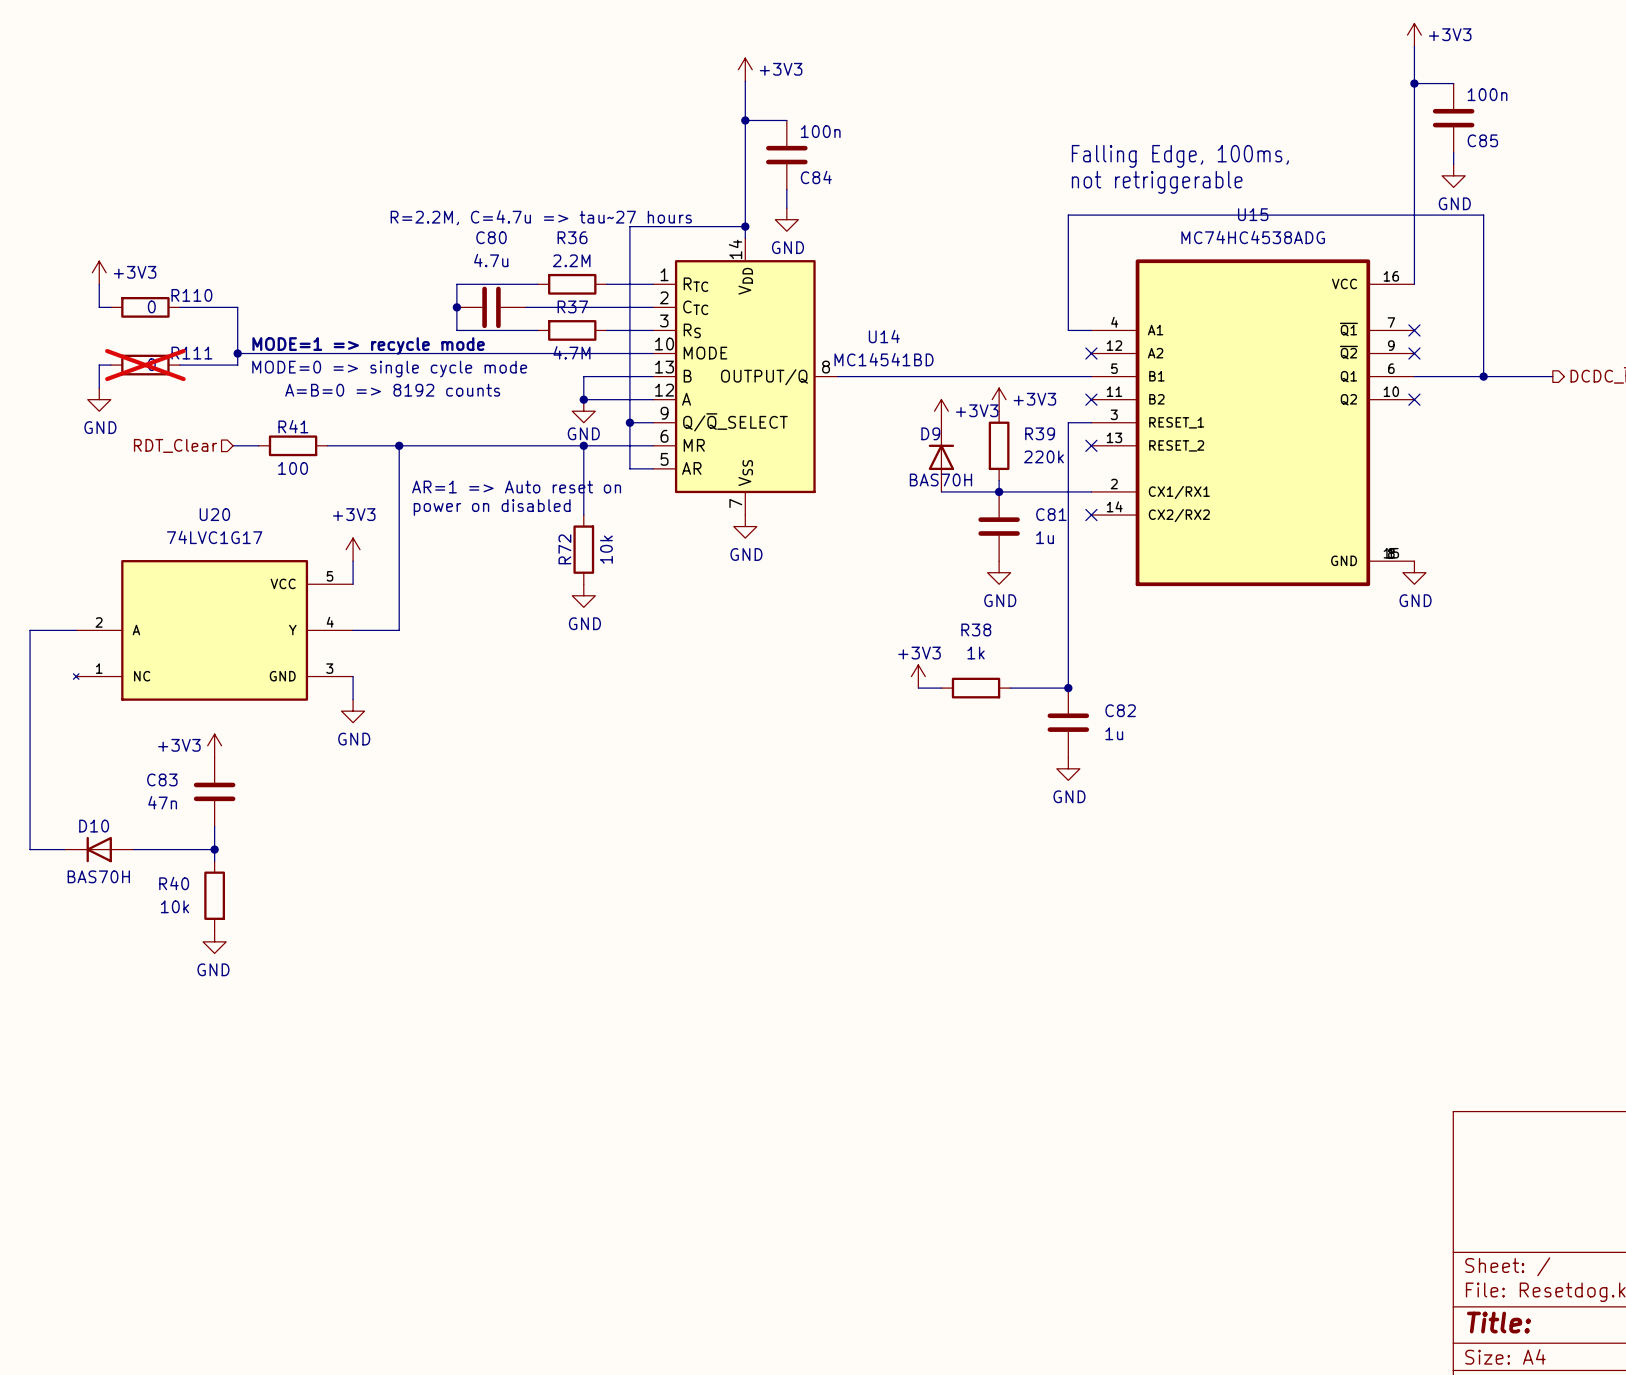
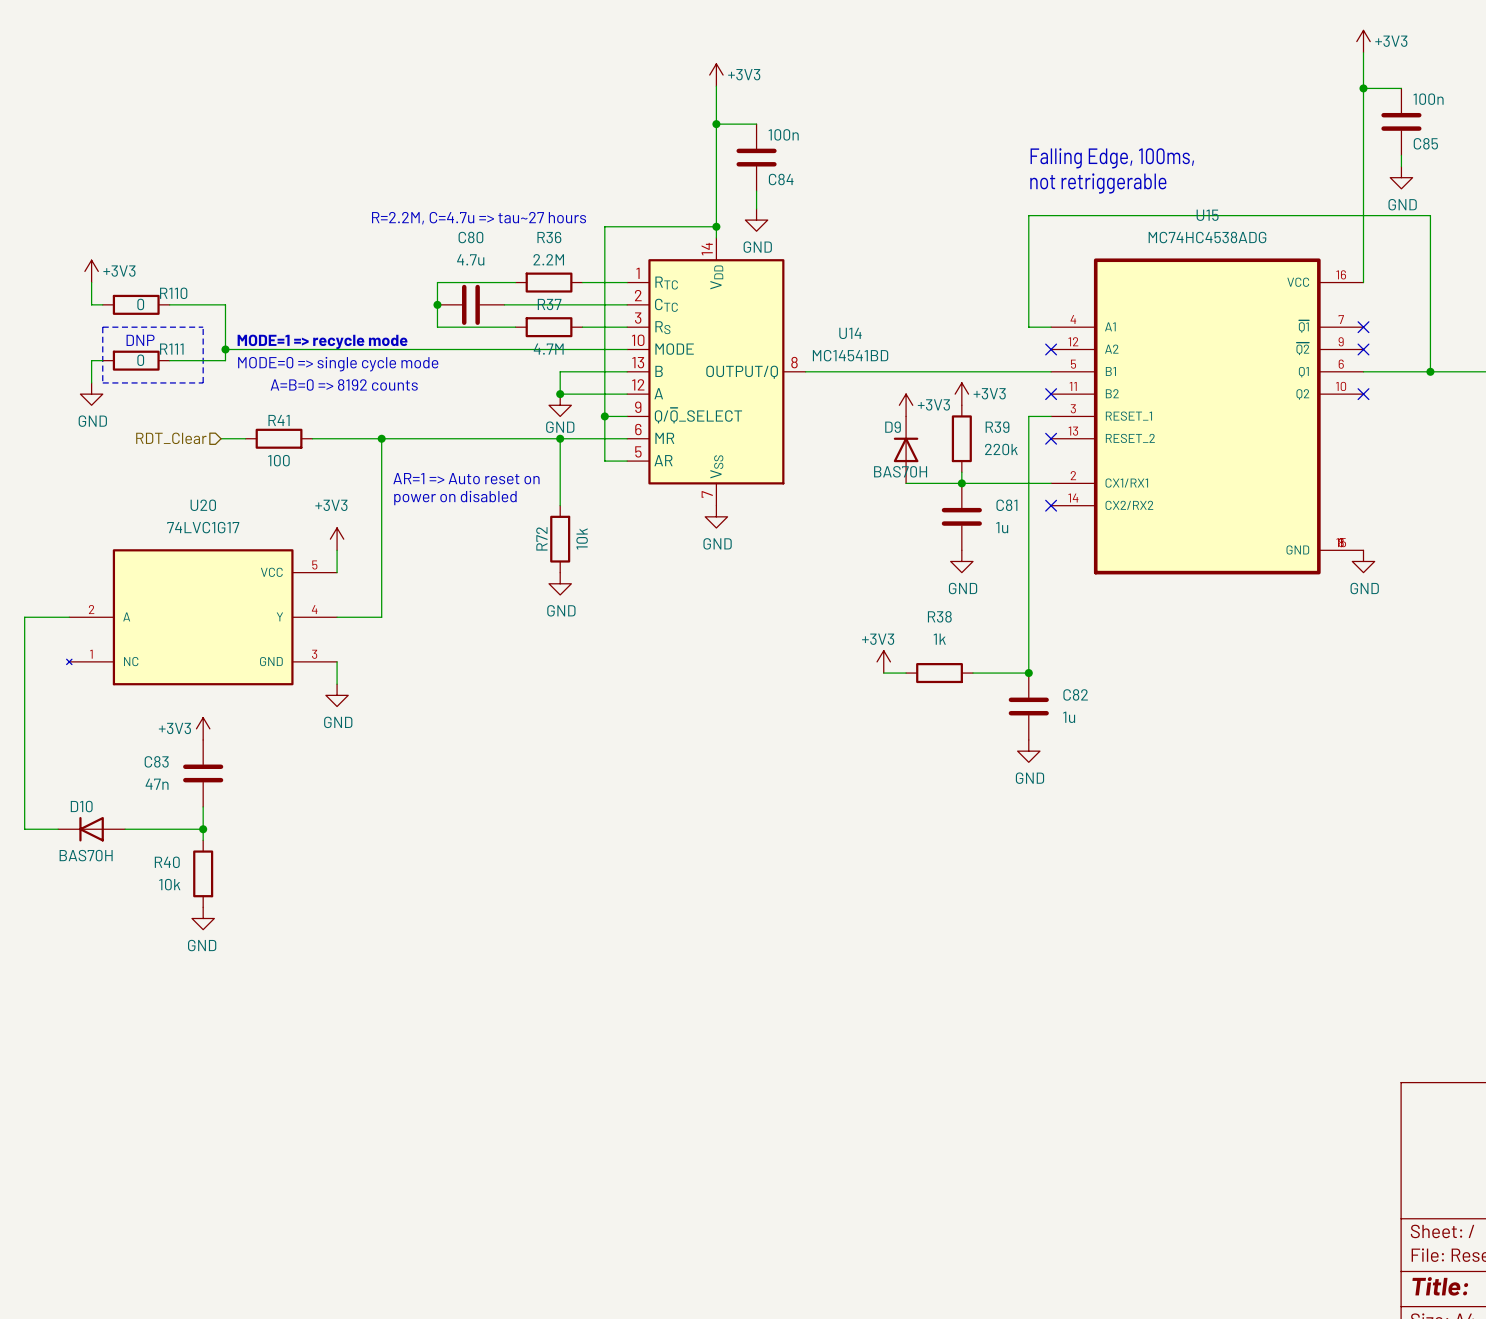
line: none -> (102, 327) (102, 382) (203, 382) (203, 327) (102, 327)
text: none -> DNP (140, 340)
R111 do-not-place cross: (145, 365) -> none

